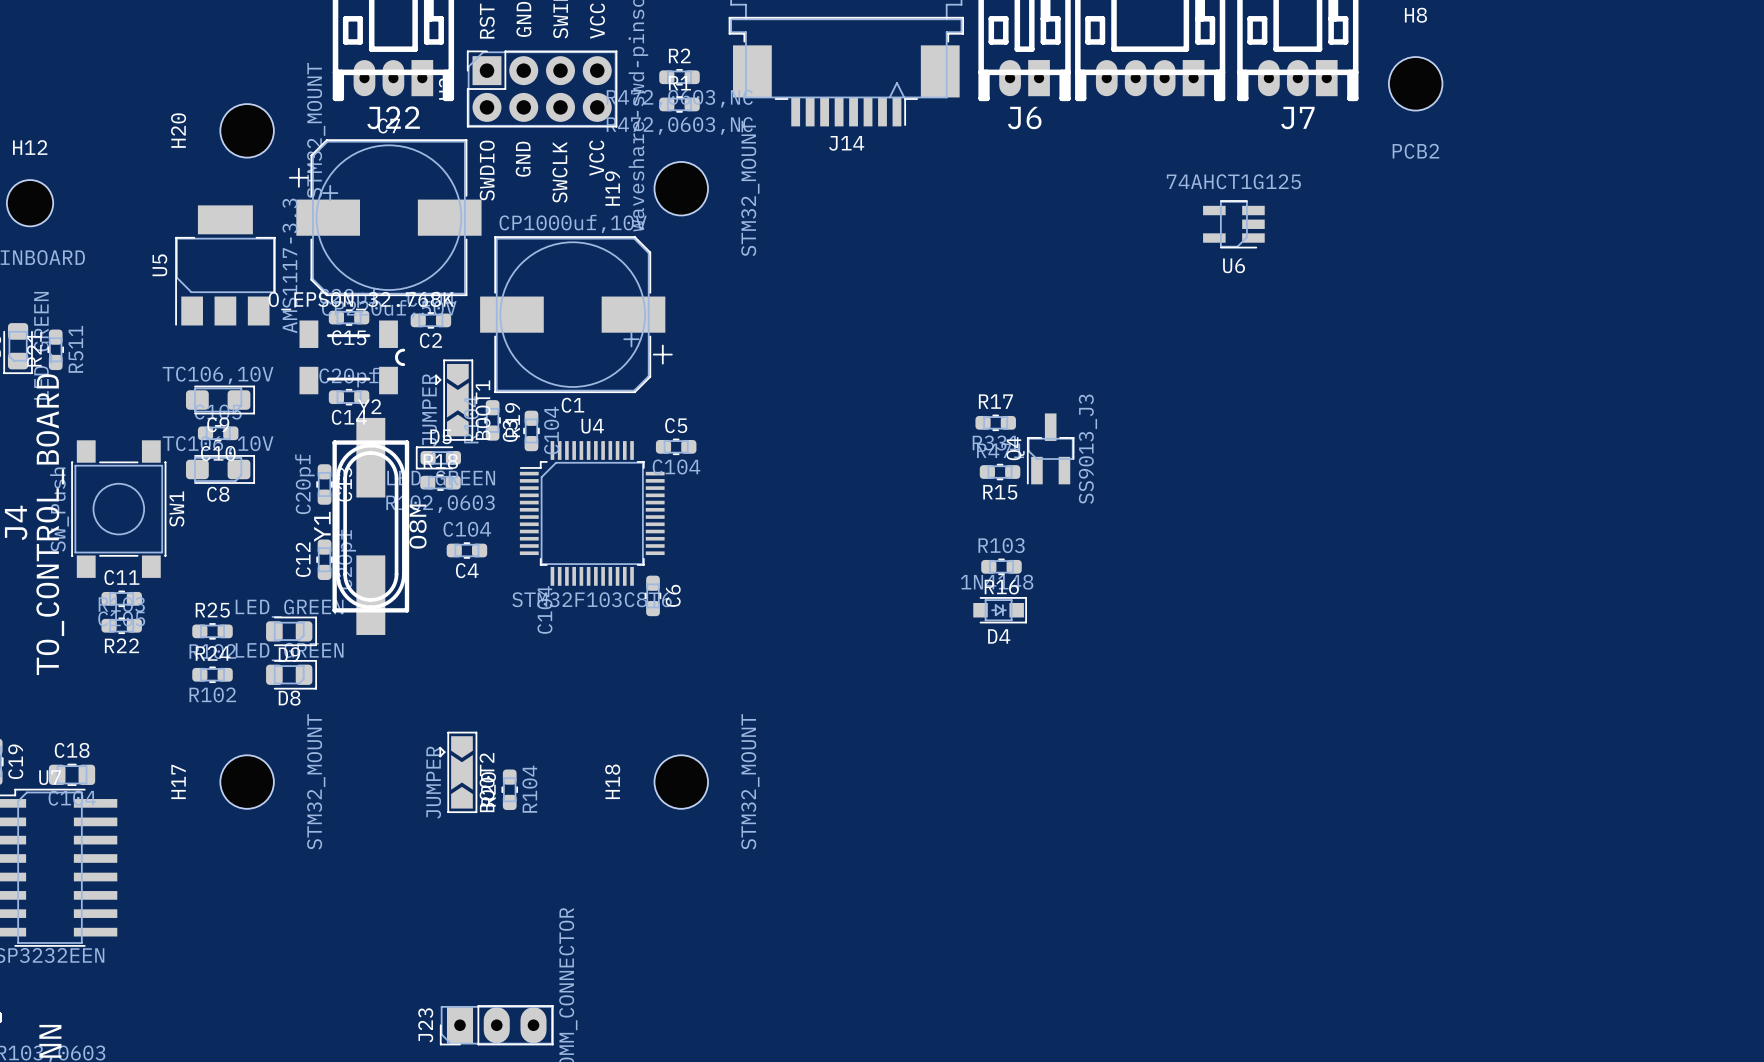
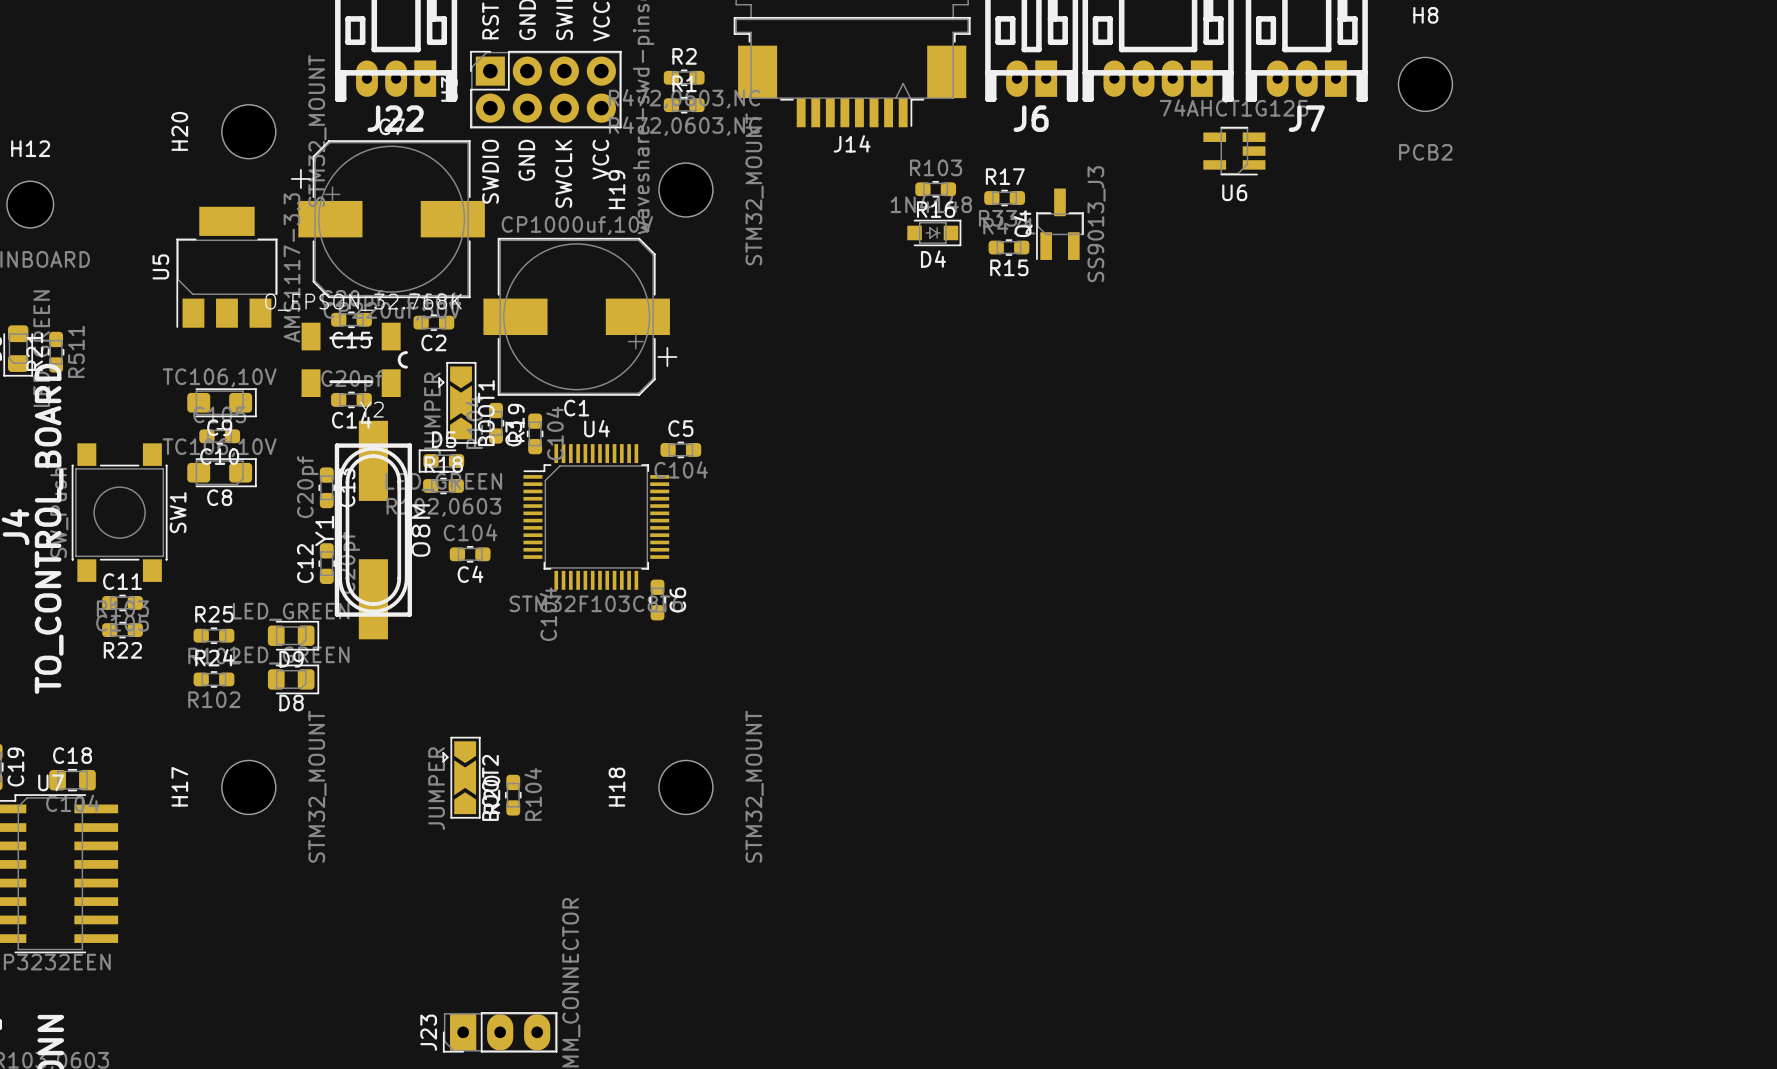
U6 position: (1233, 224) -> (1234, 151)
R17 position: (995, 422) -> (1004, 198)
Q4 position: (1050, 448) -> (1059, 224)
R15 position: (1000, 472) -> (1008, 247)
R16 position: (1001, 566) -> (935, 189)
D4 position: (1000, 610) -> (934, 232)

